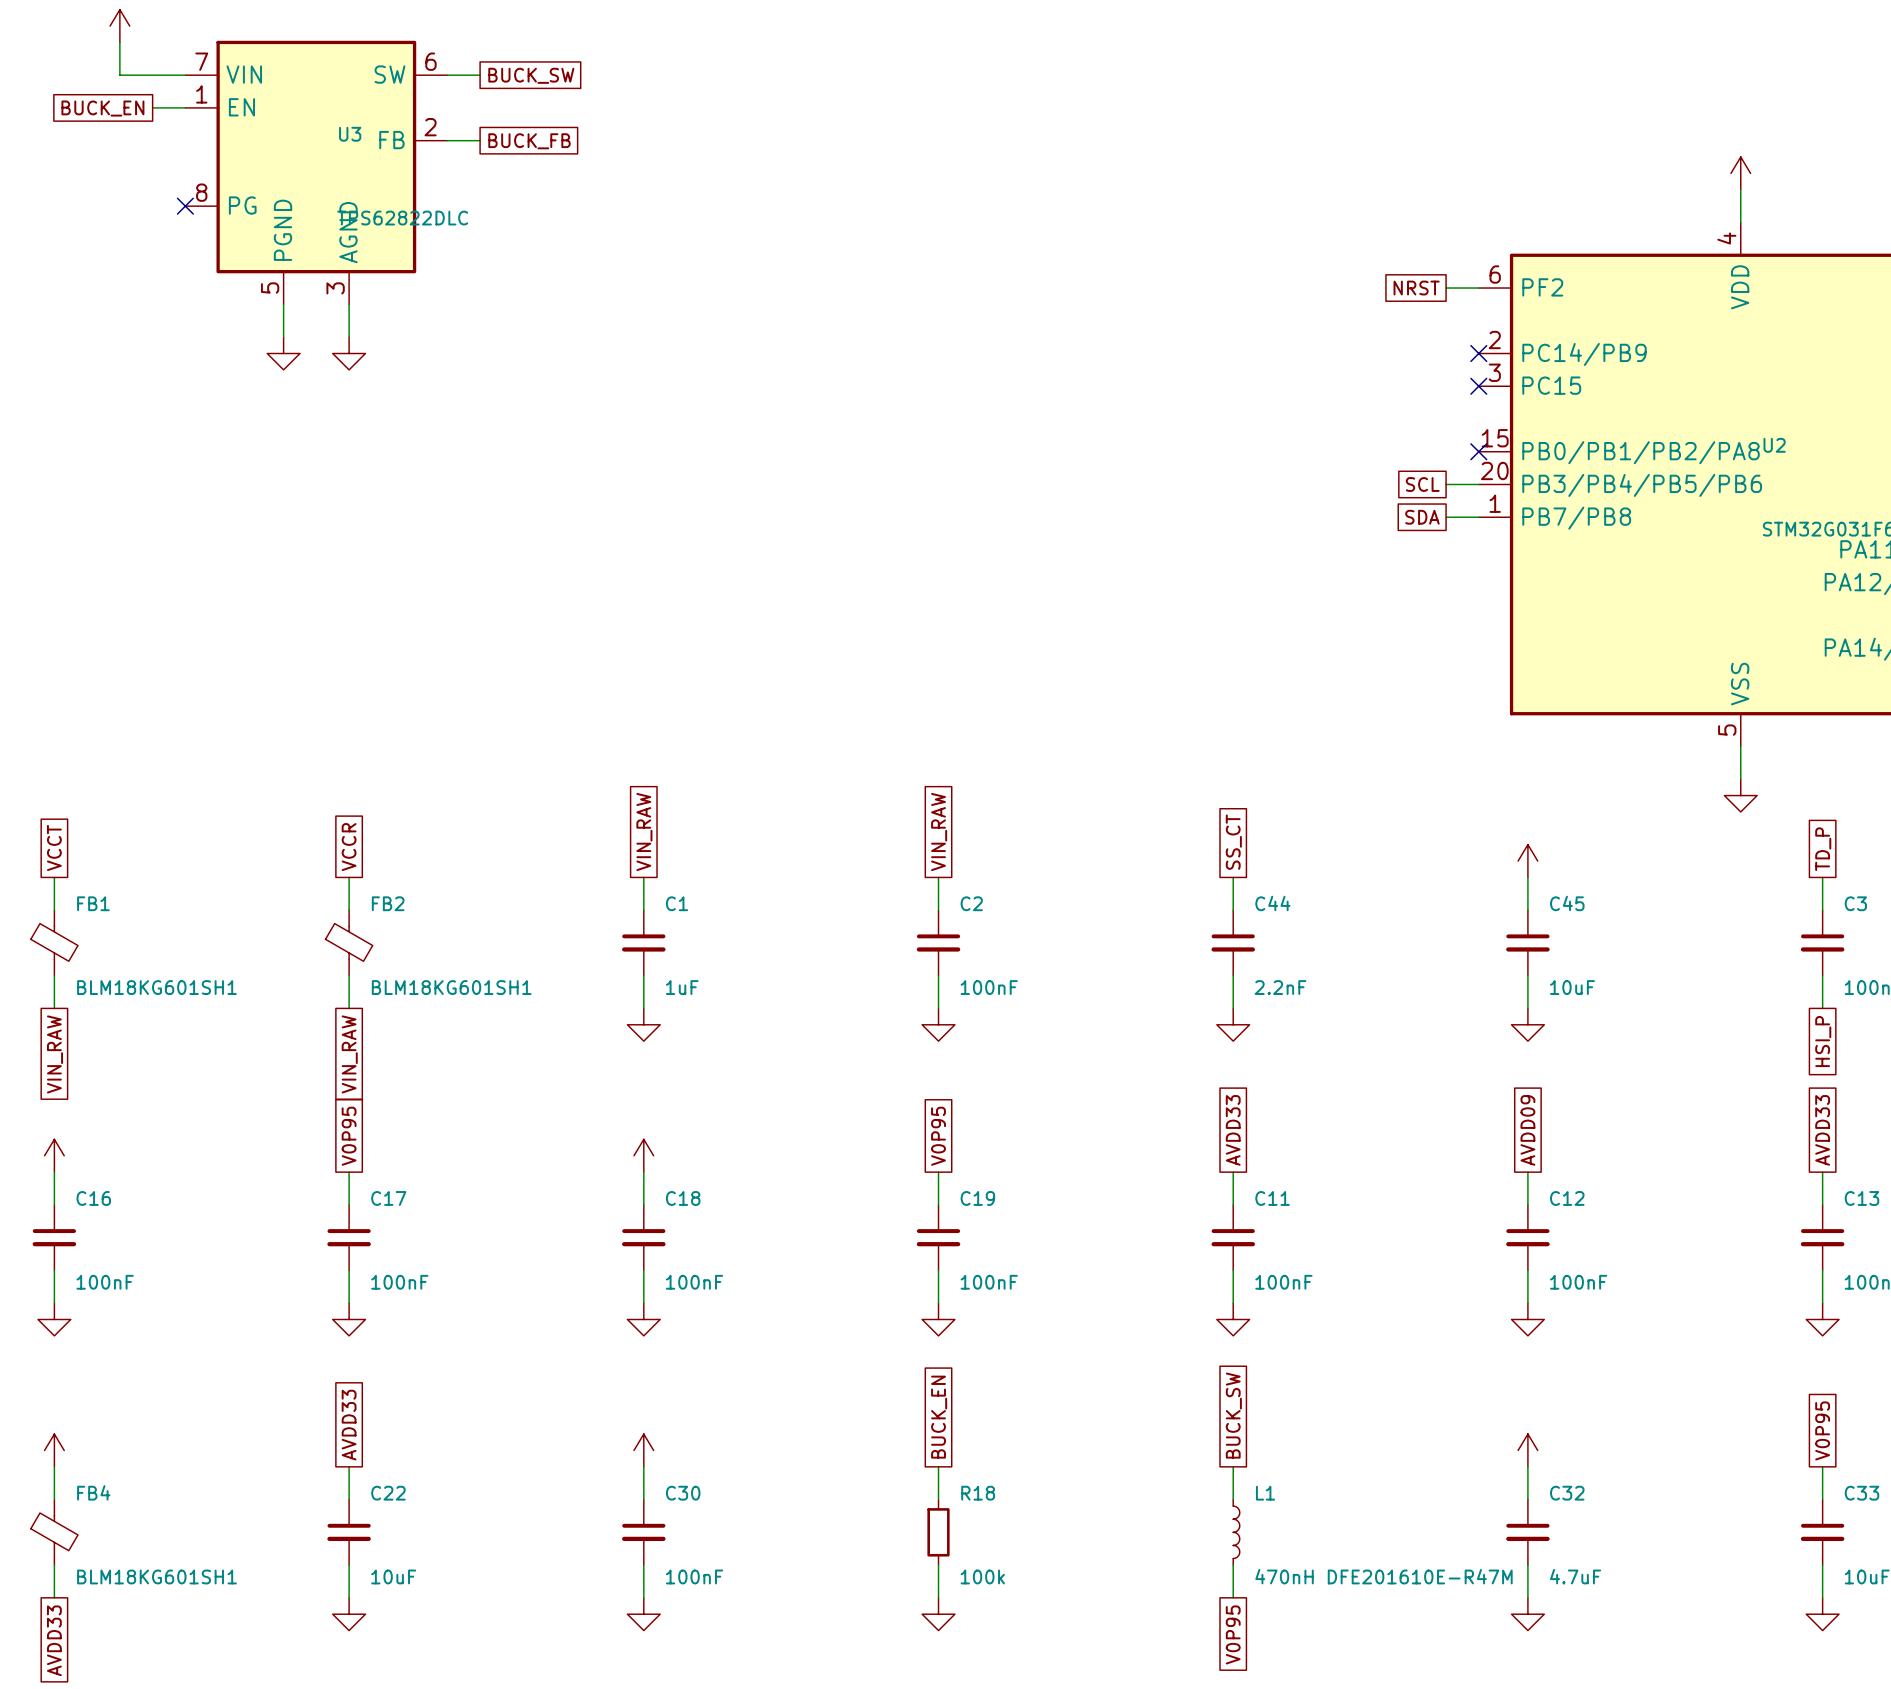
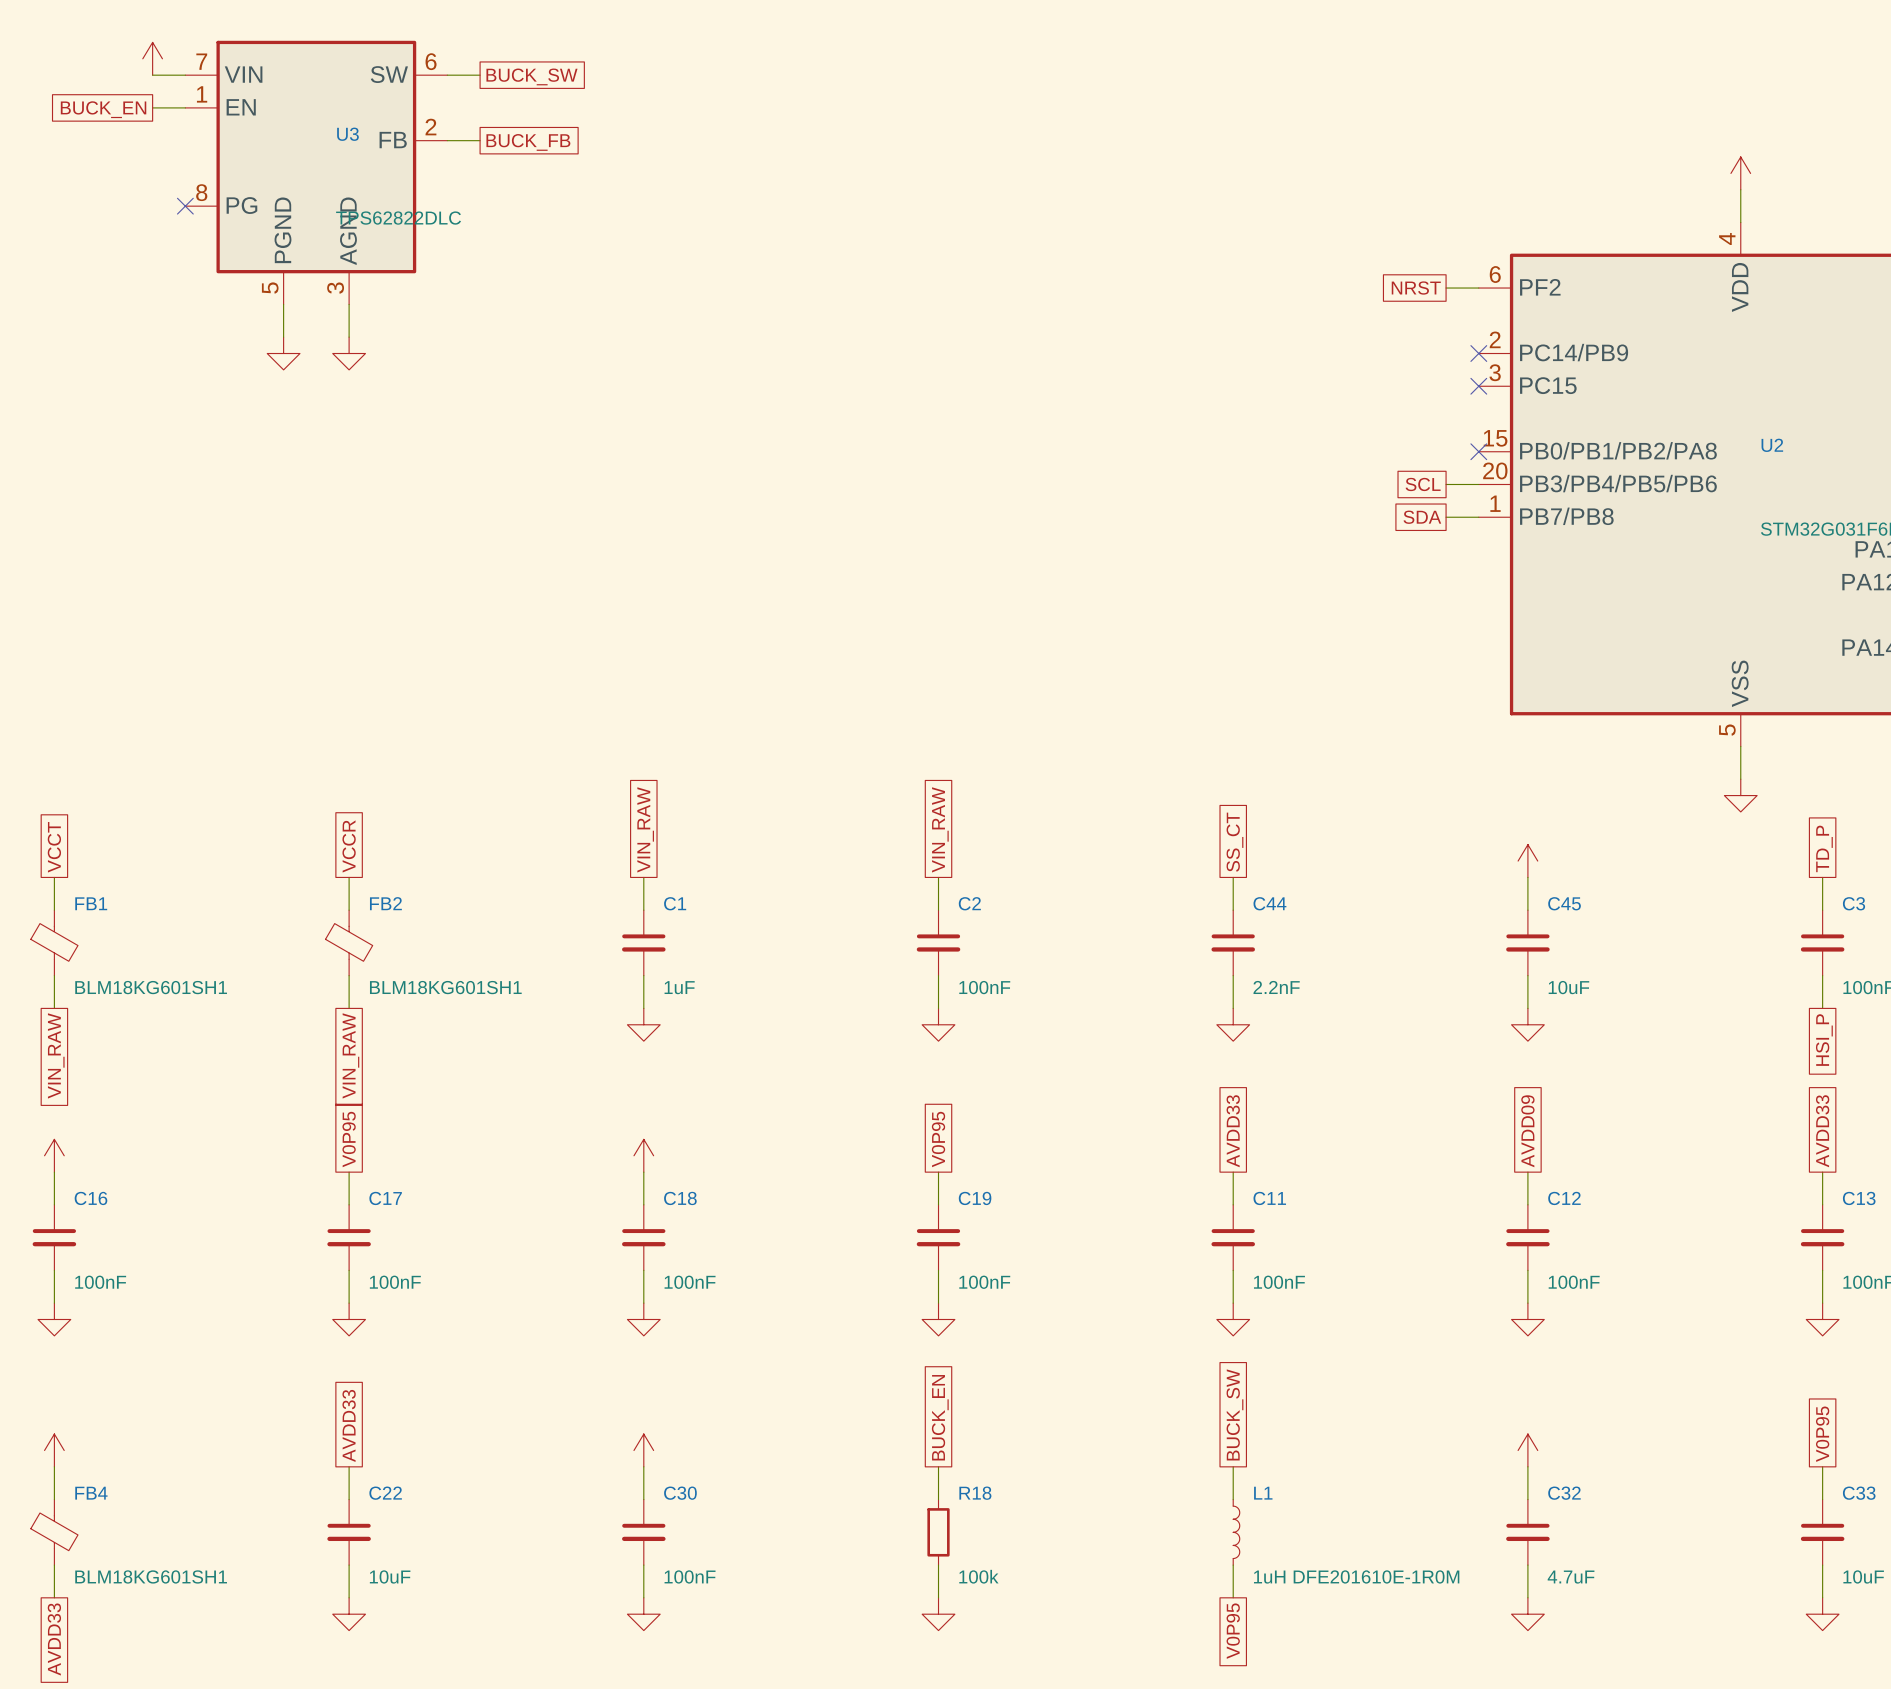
power symbol position: (119, 26) -> (152, 58)
wire: (119, 42) (119, 75) (152, 75) -> none
L1 value: 470nH DFE201610E-R47M (1383, 1576) -> 1uH DFE201610E-1R0M (1356, 1576)

